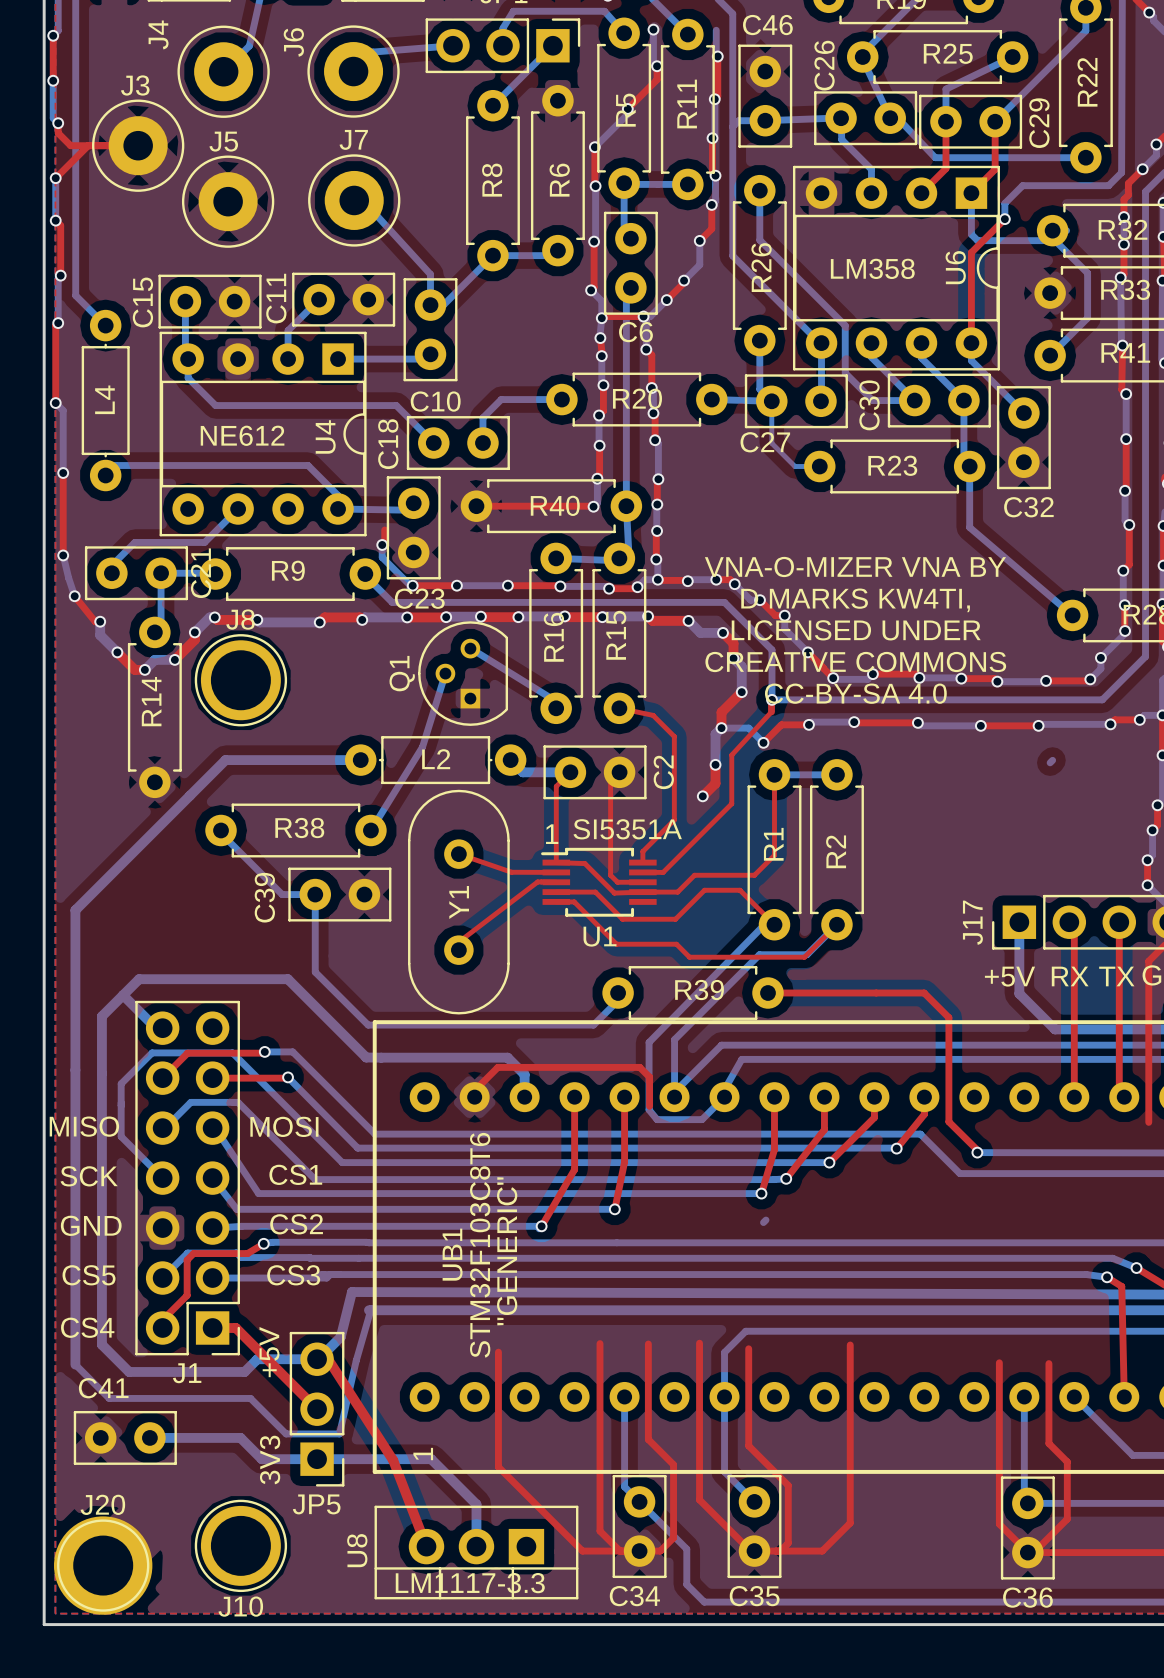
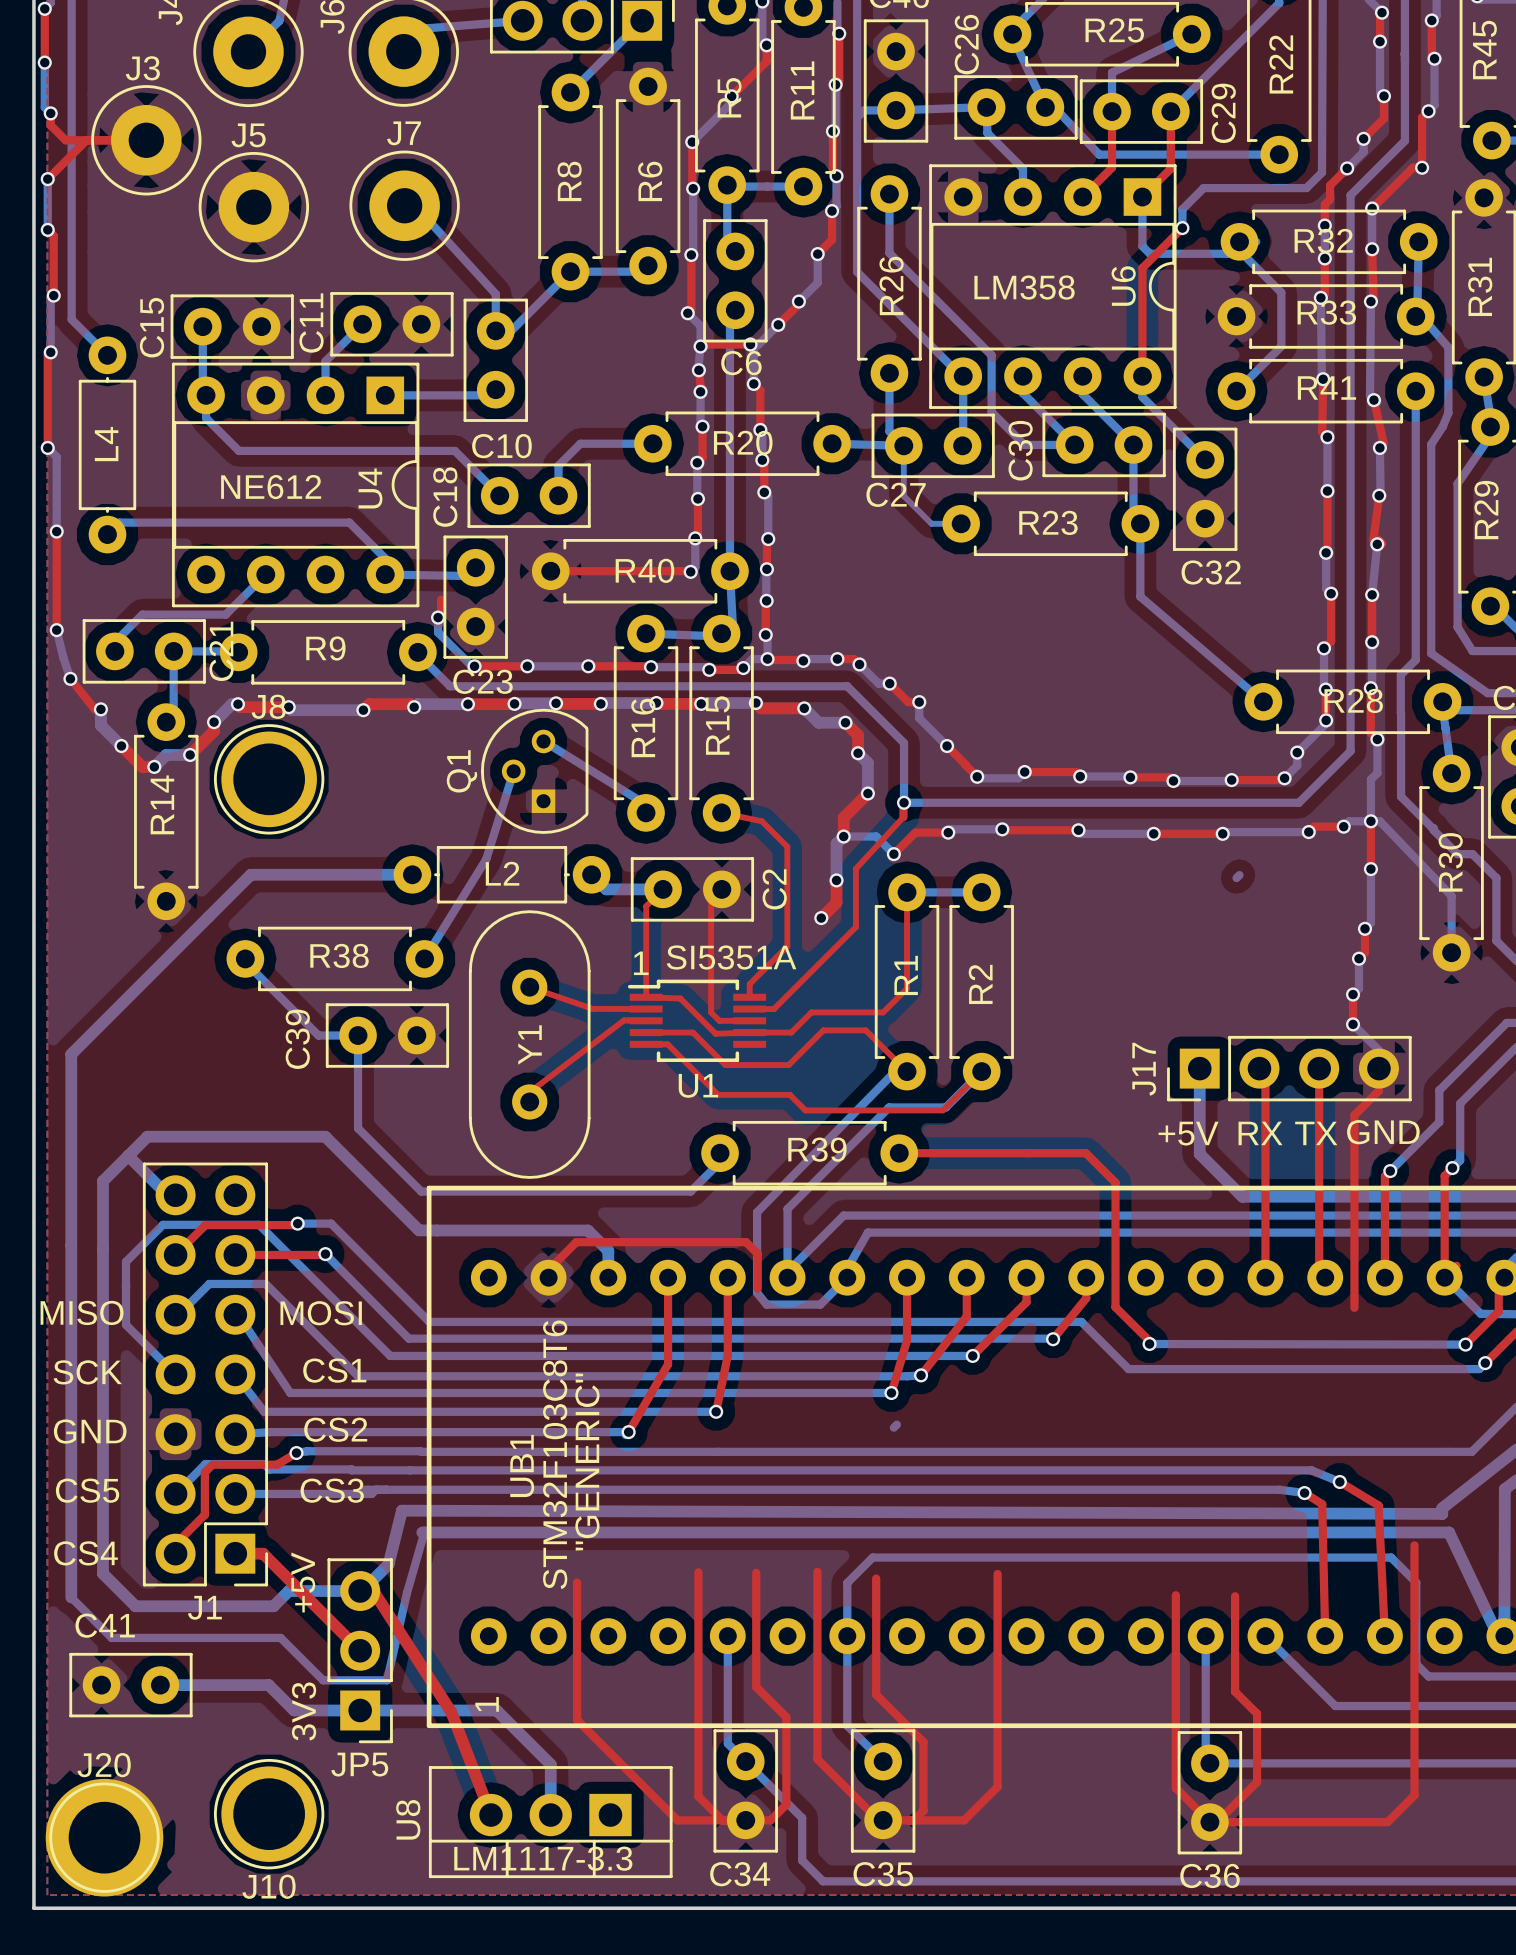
text: VNA-O-MIZER VNA BY (855, 566) -> none
text: D MARKS KW4TI, (855, 600) -> none
text: LICENSED UNDER (856, 630) -> none
text: CREATIVE COMMONS (855, 662) -> none
text: CC-BY-SA 4.0 (855, 693) -> none

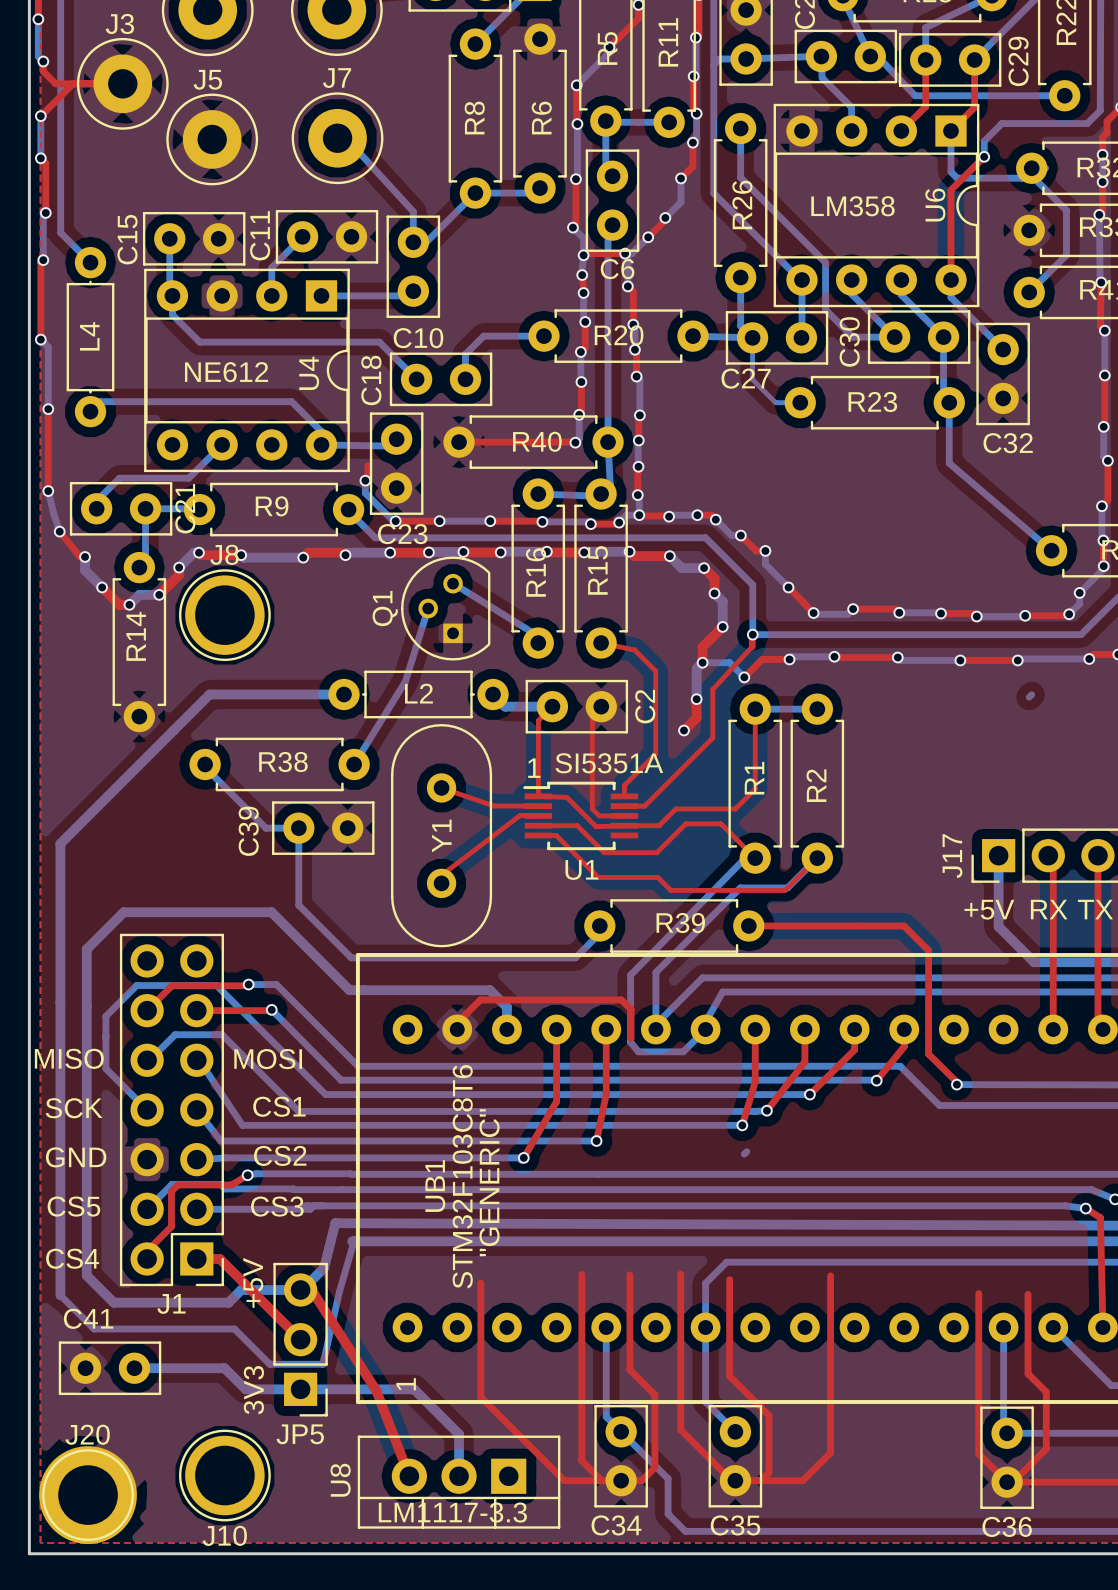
bottom track: (128, 1155) (167, 1195) (175, 1195) -> none

